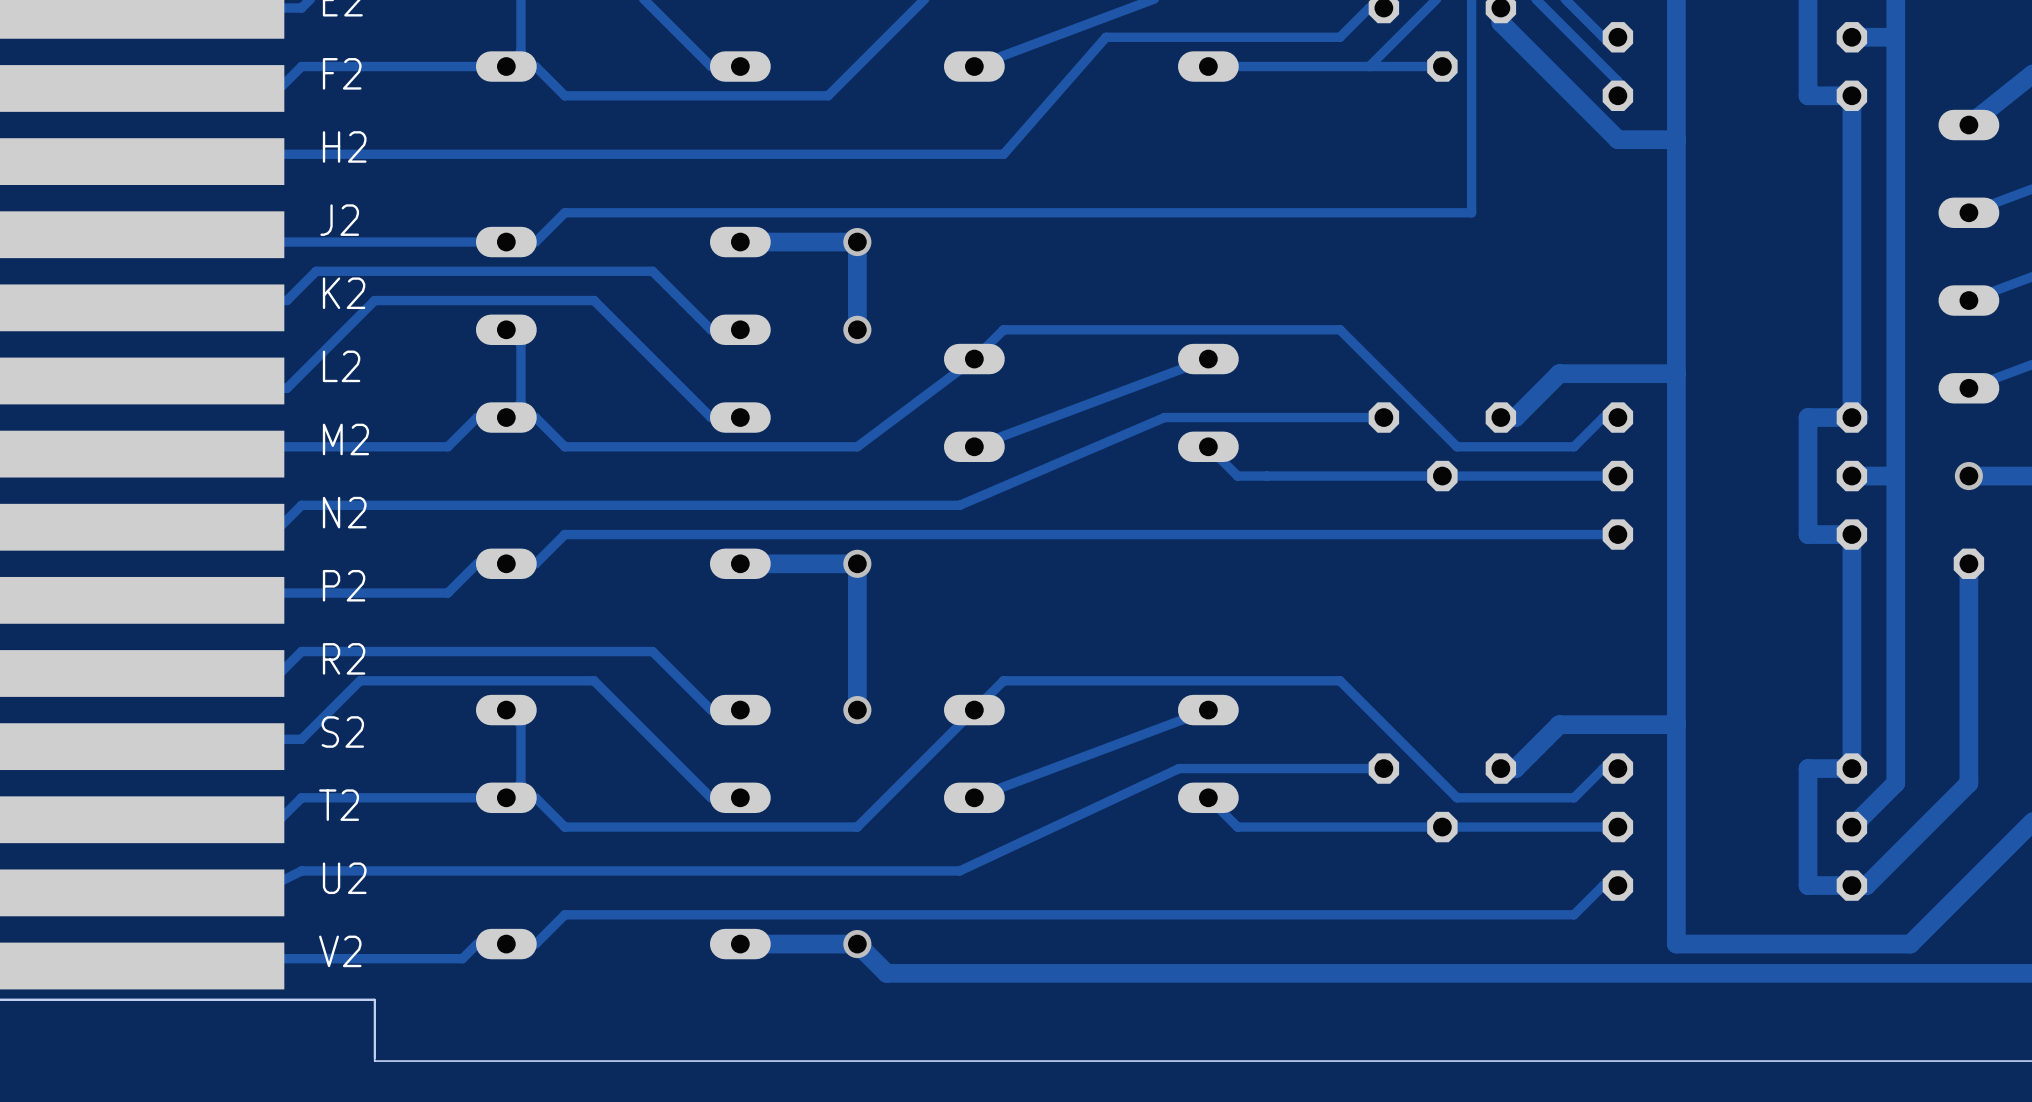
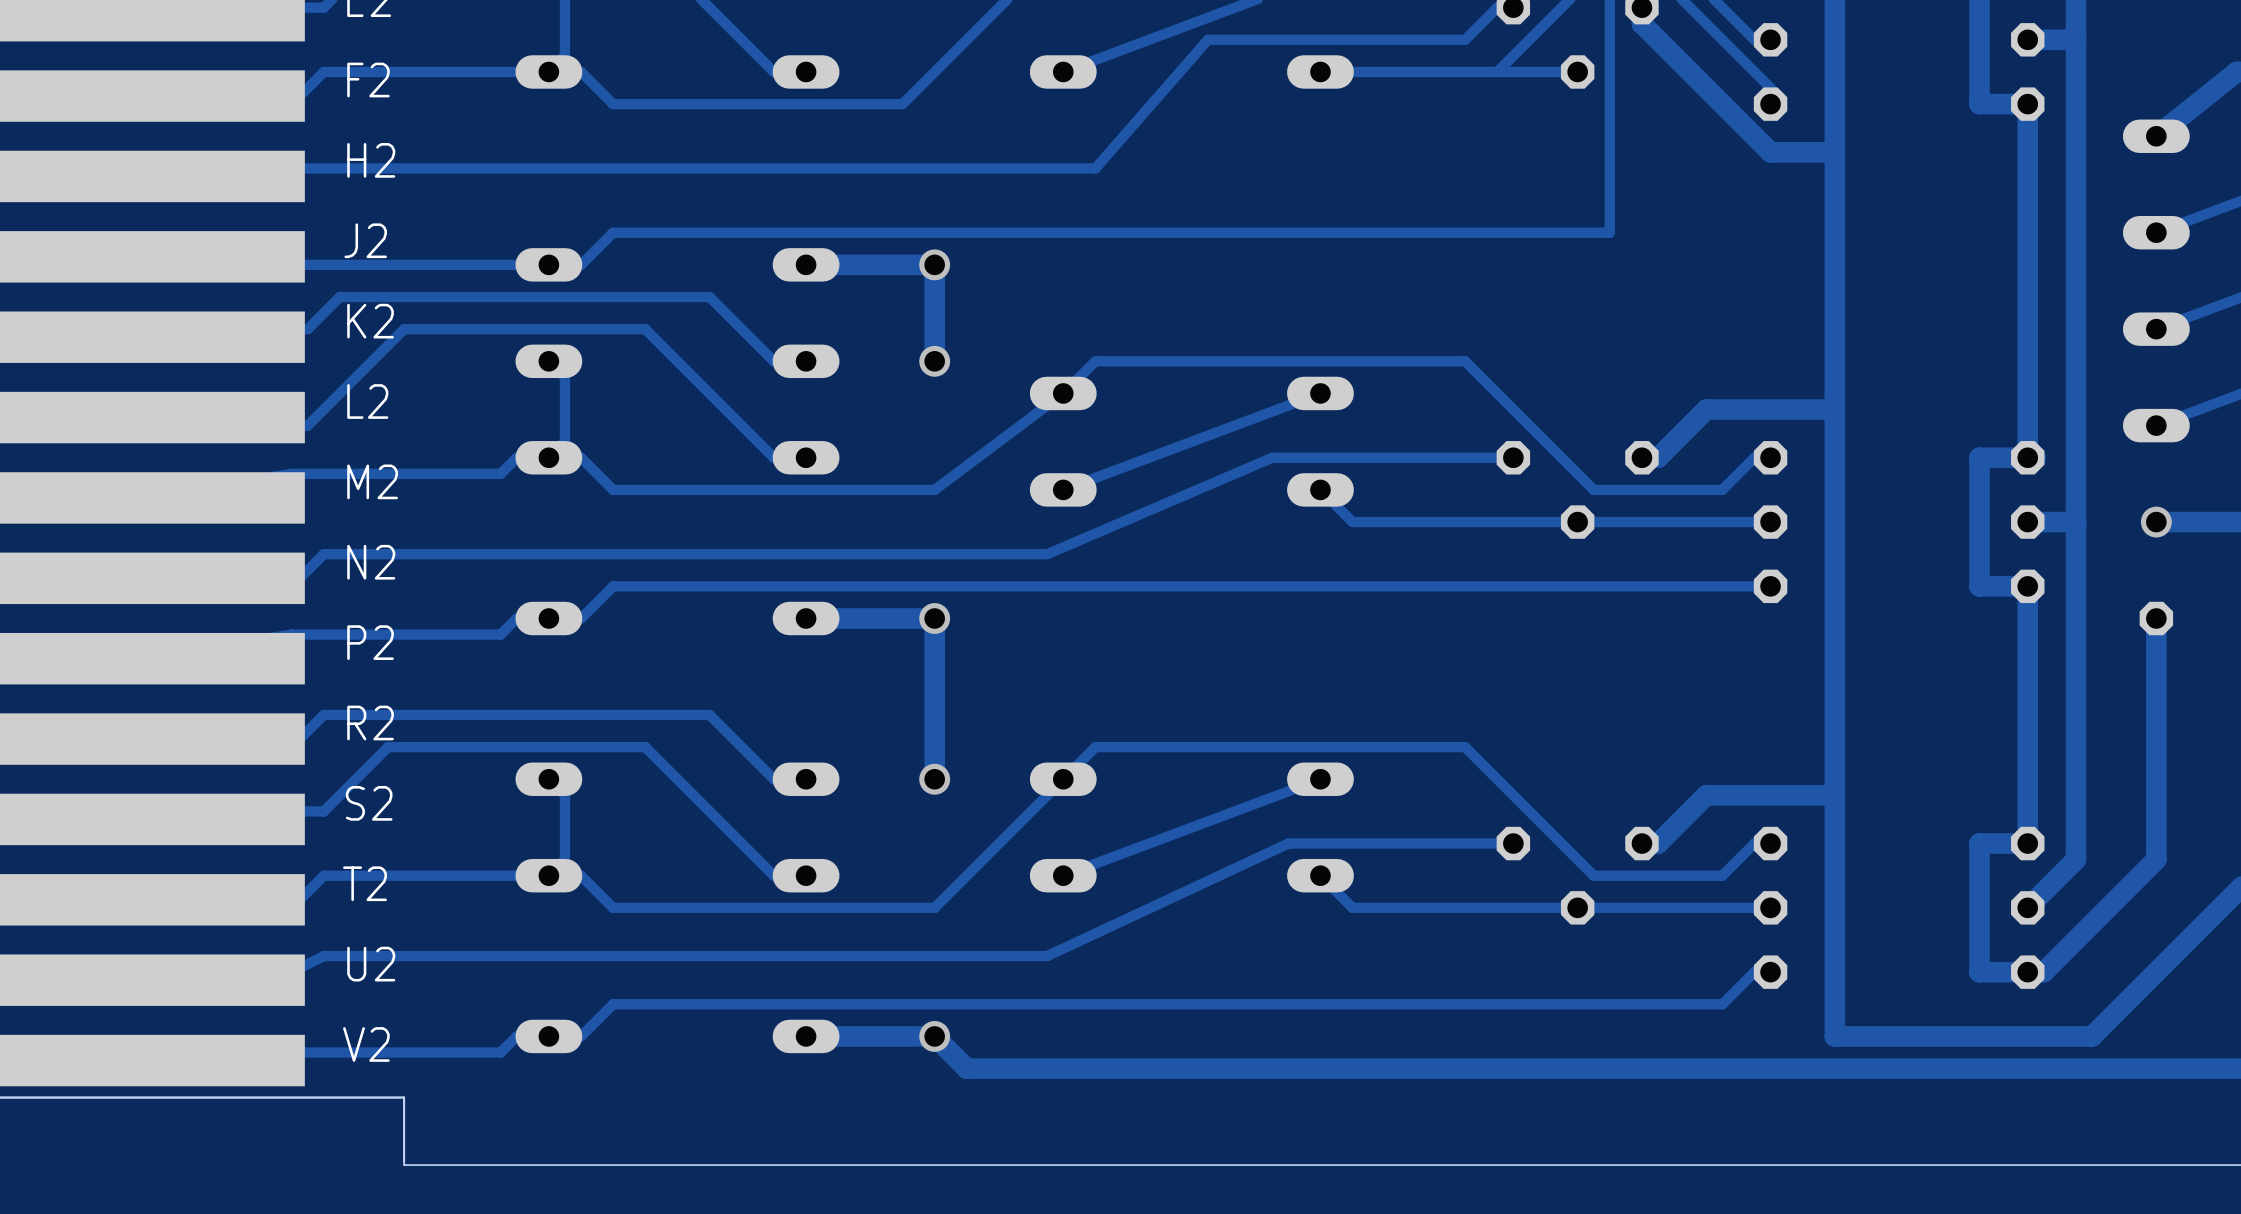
track: (462, 432) (447, 446) (257, 446) (133, 454) -> (500, 473) (291, 473) (138, 497)
track: (462, 578) (447, 593) (272, 593) (133, 600) -> (500, 634) (291, 634) (138, 658)

